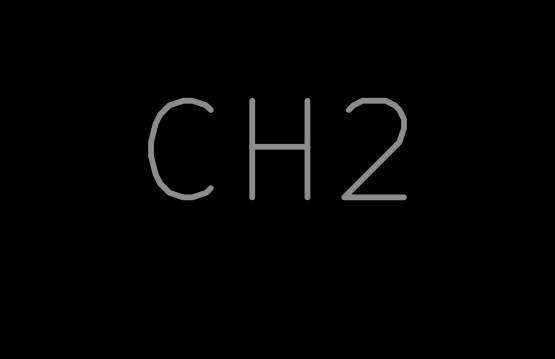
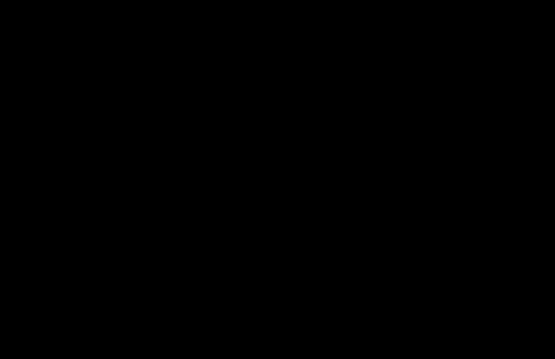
text: CH2 (277, 149) -> none

